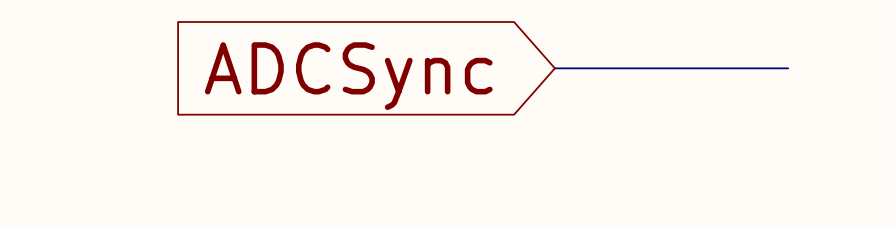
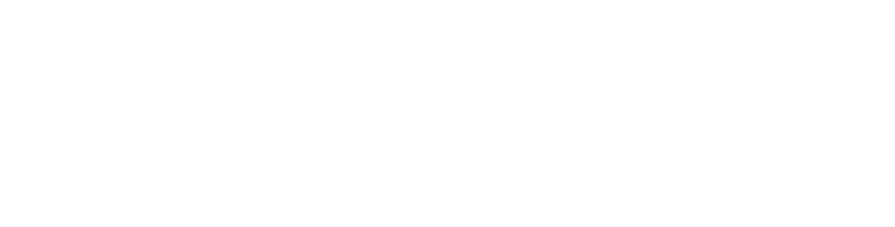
wire: (554, 68) (788, 68) -> none
global label: ADCSync (348, 76) -> none

